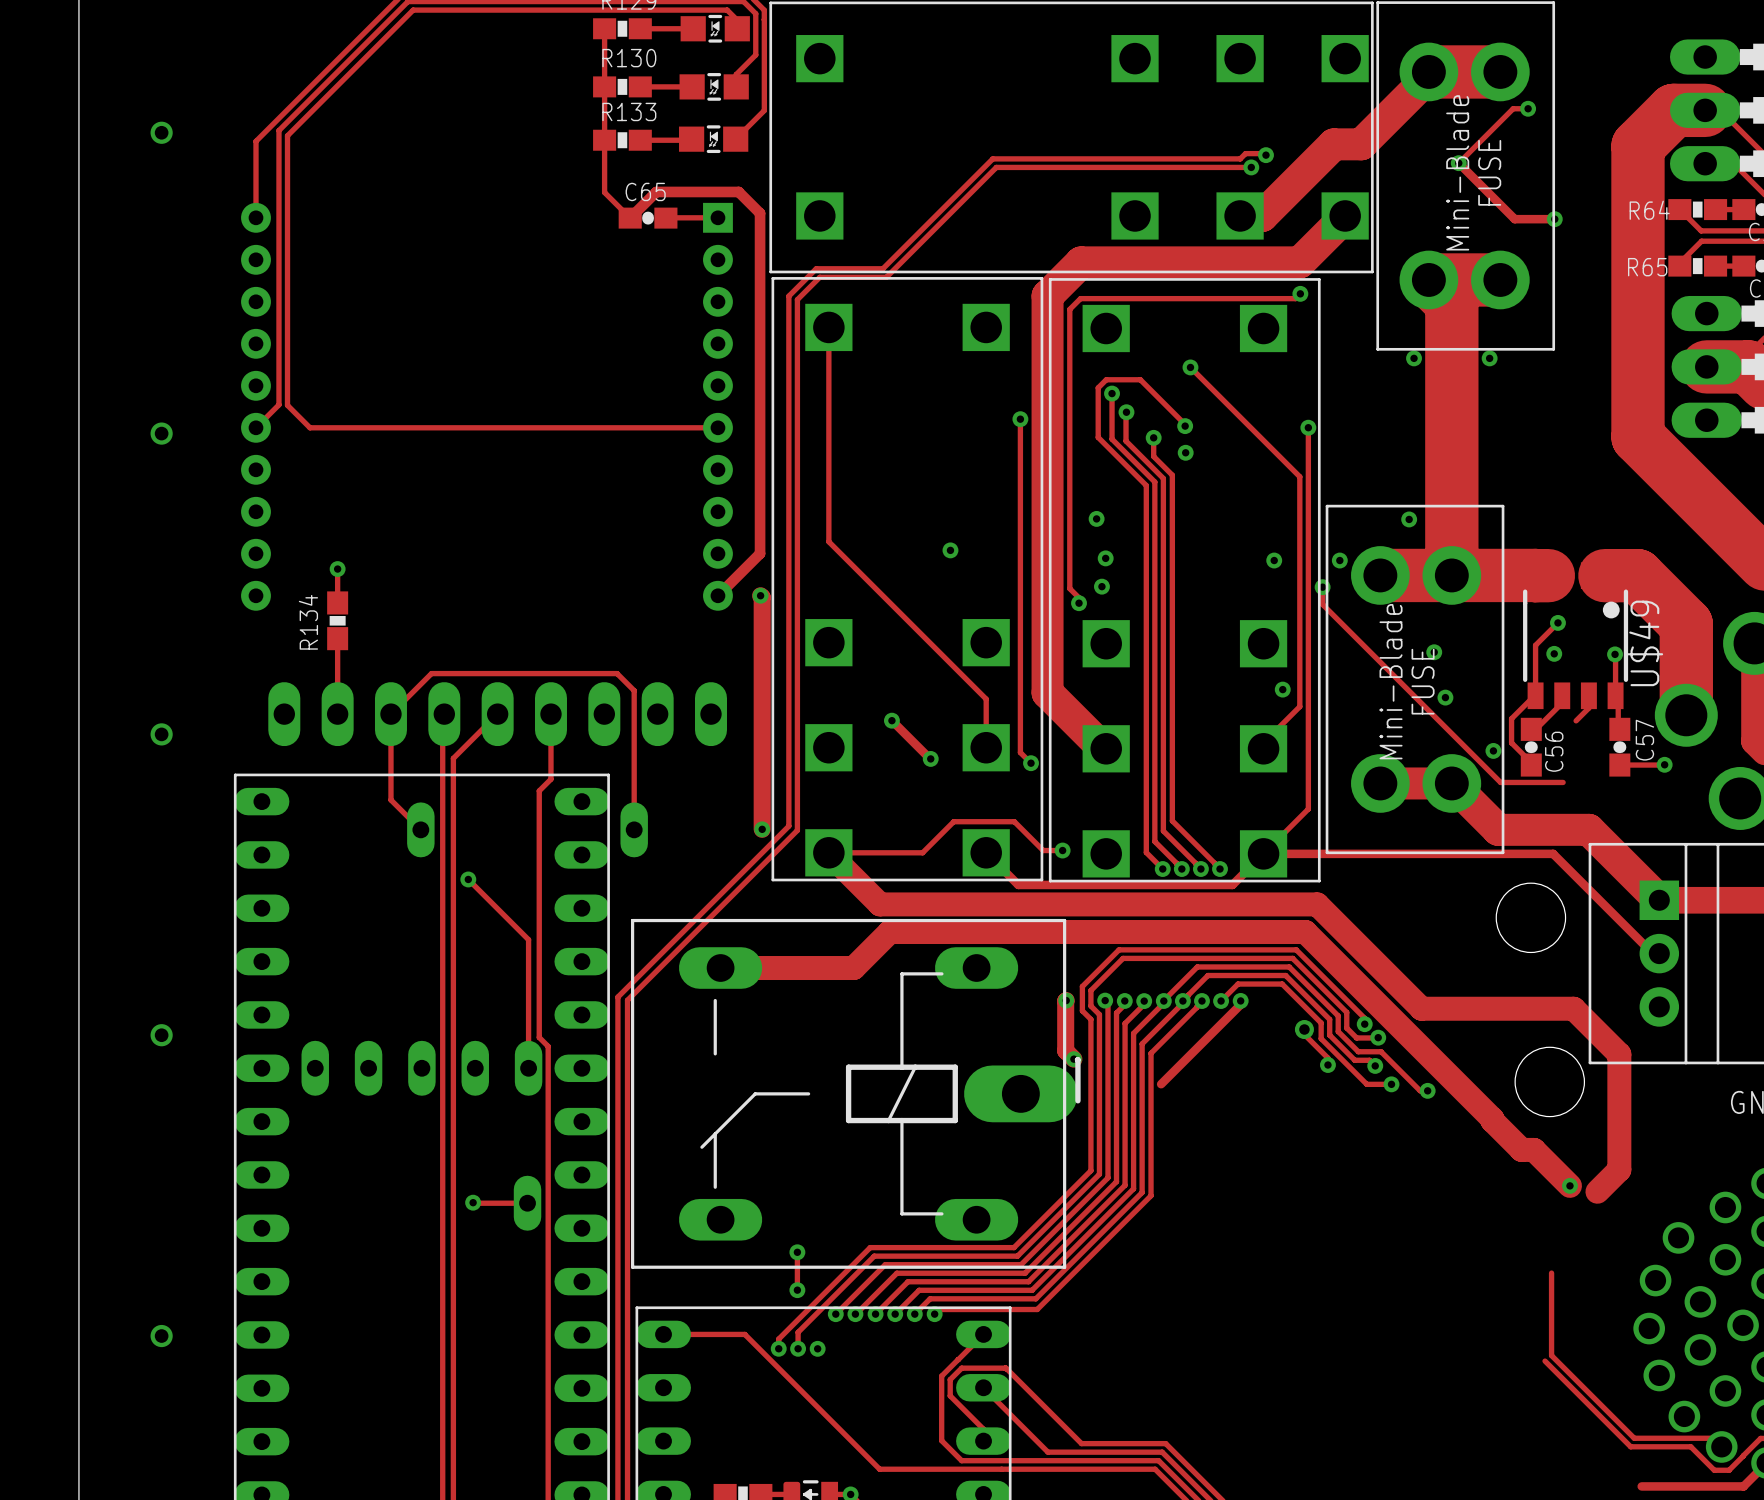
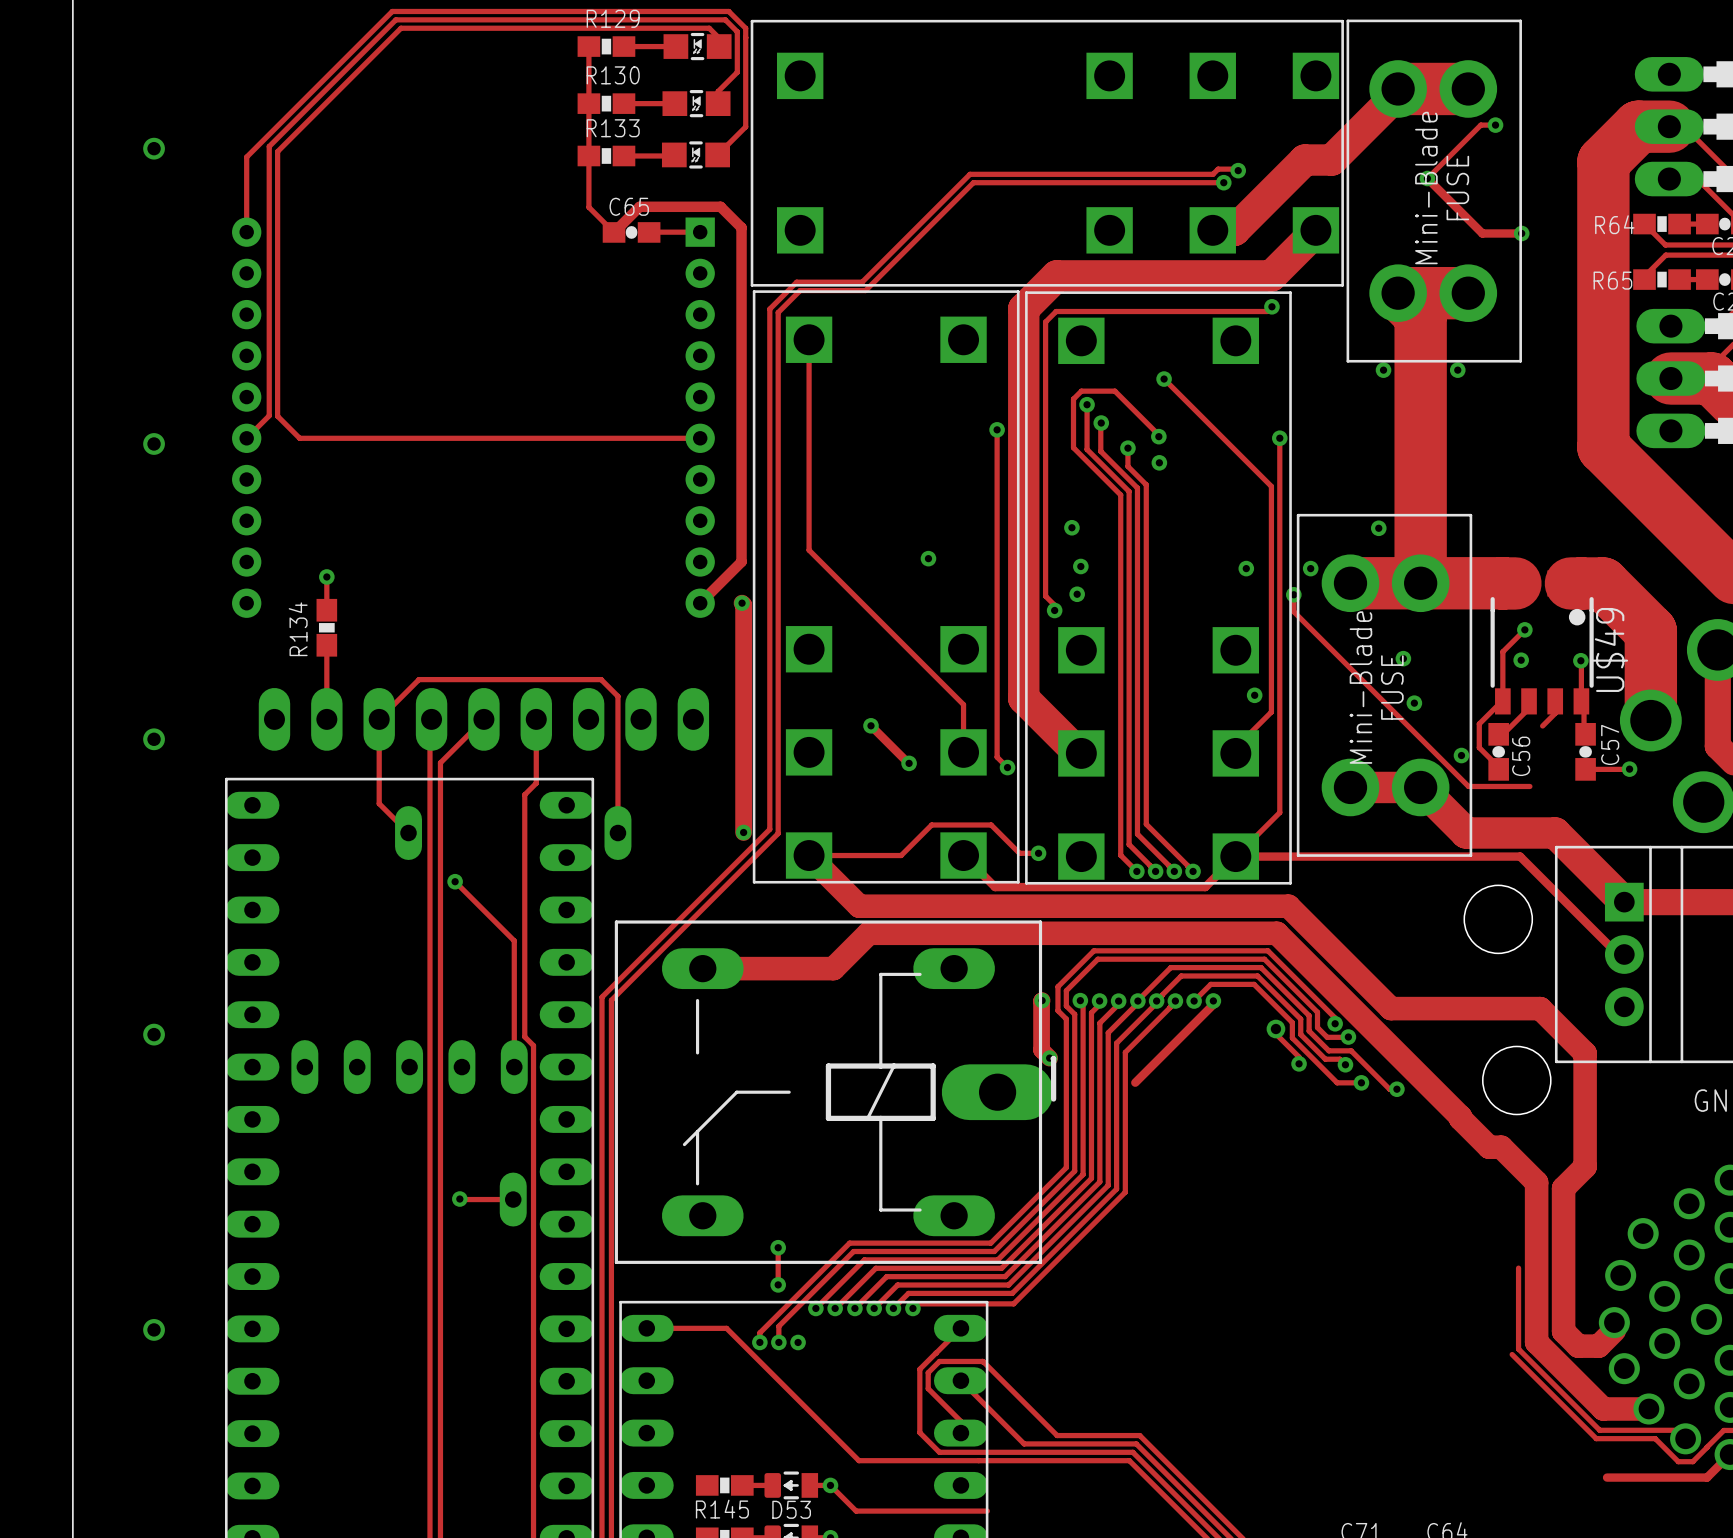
track: none -> (1536, 1182) (1536, 1342) (1603, 1408) (1648, 1408)
via: (1569, 1185) -> none
track: none -> (1563, 1188) (1563, 1331) (1578, 1346) (1598, 1346) (1614, 1330)

